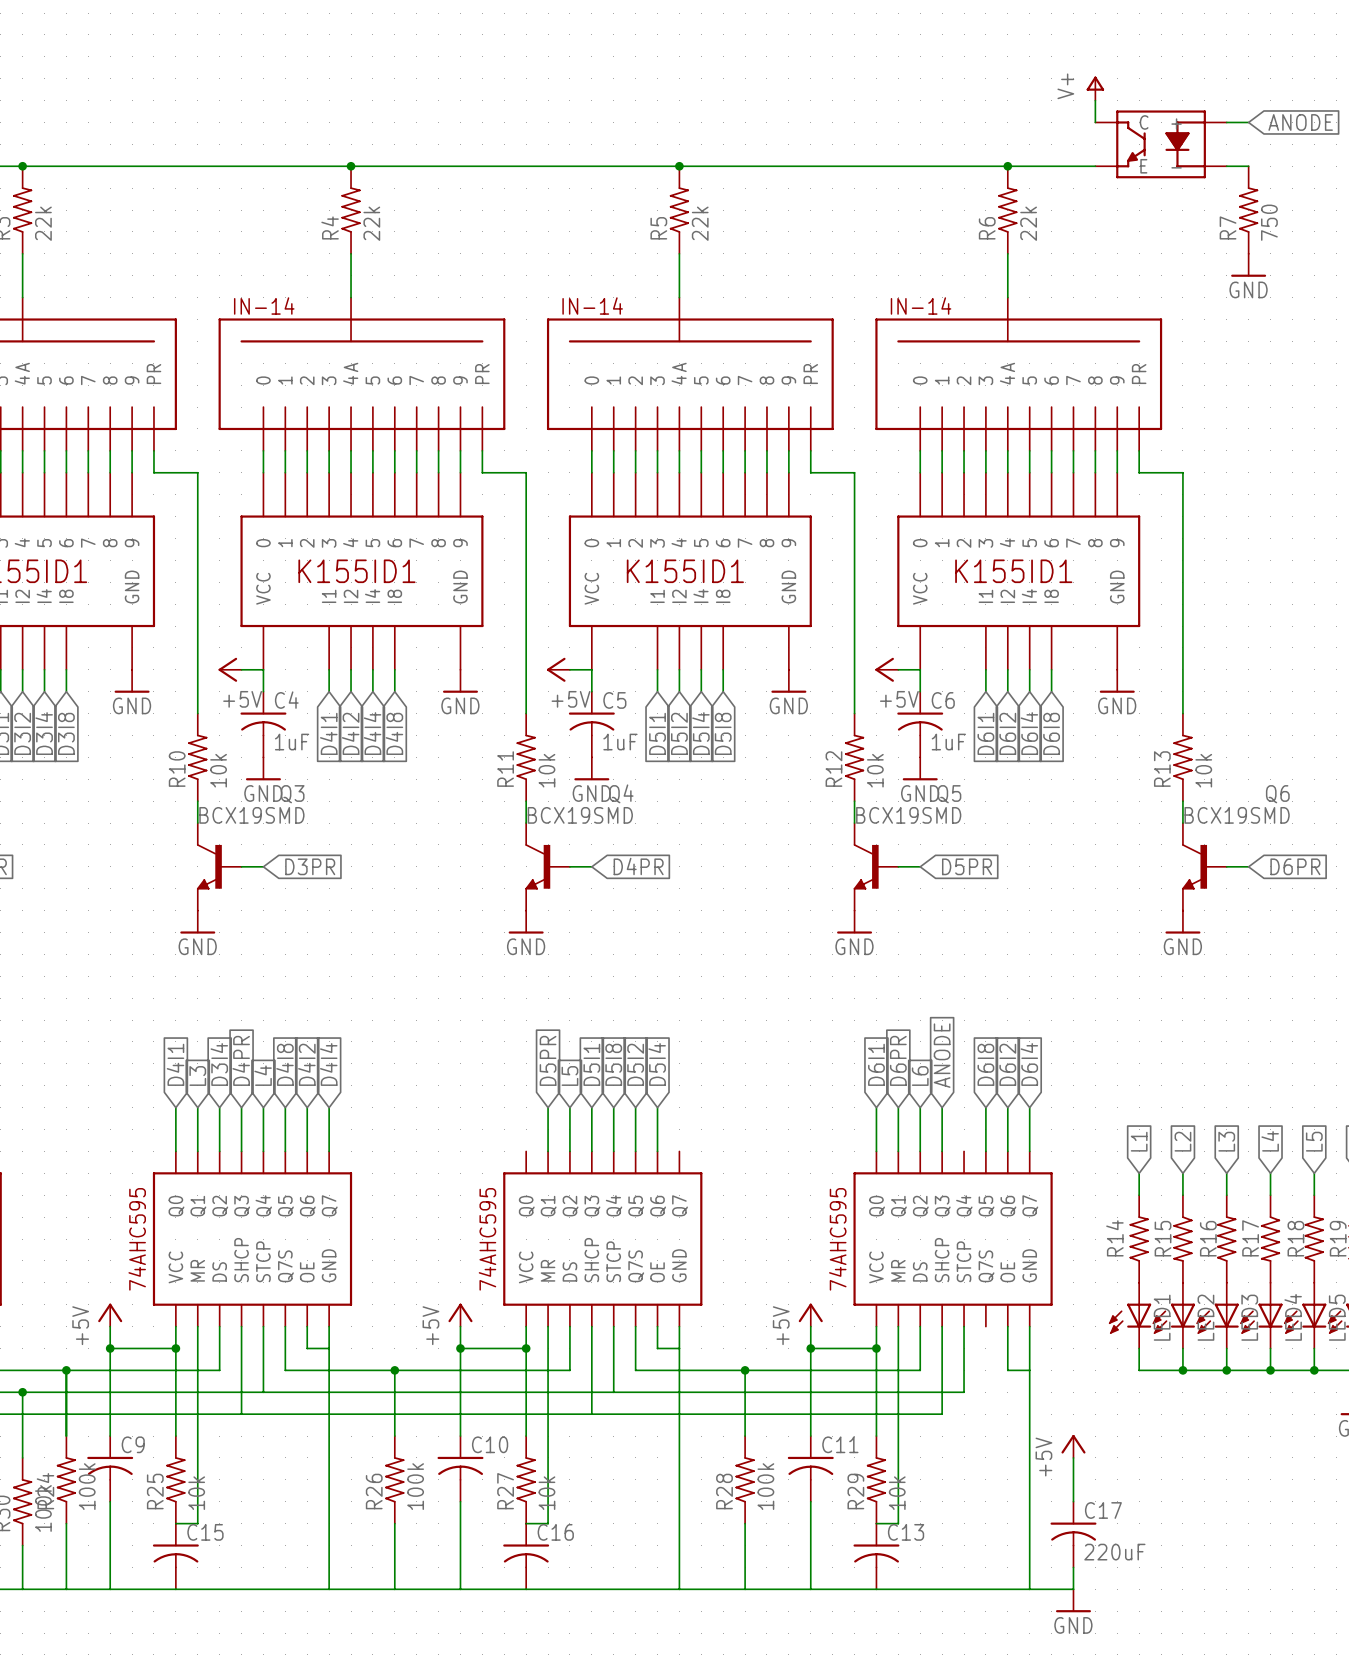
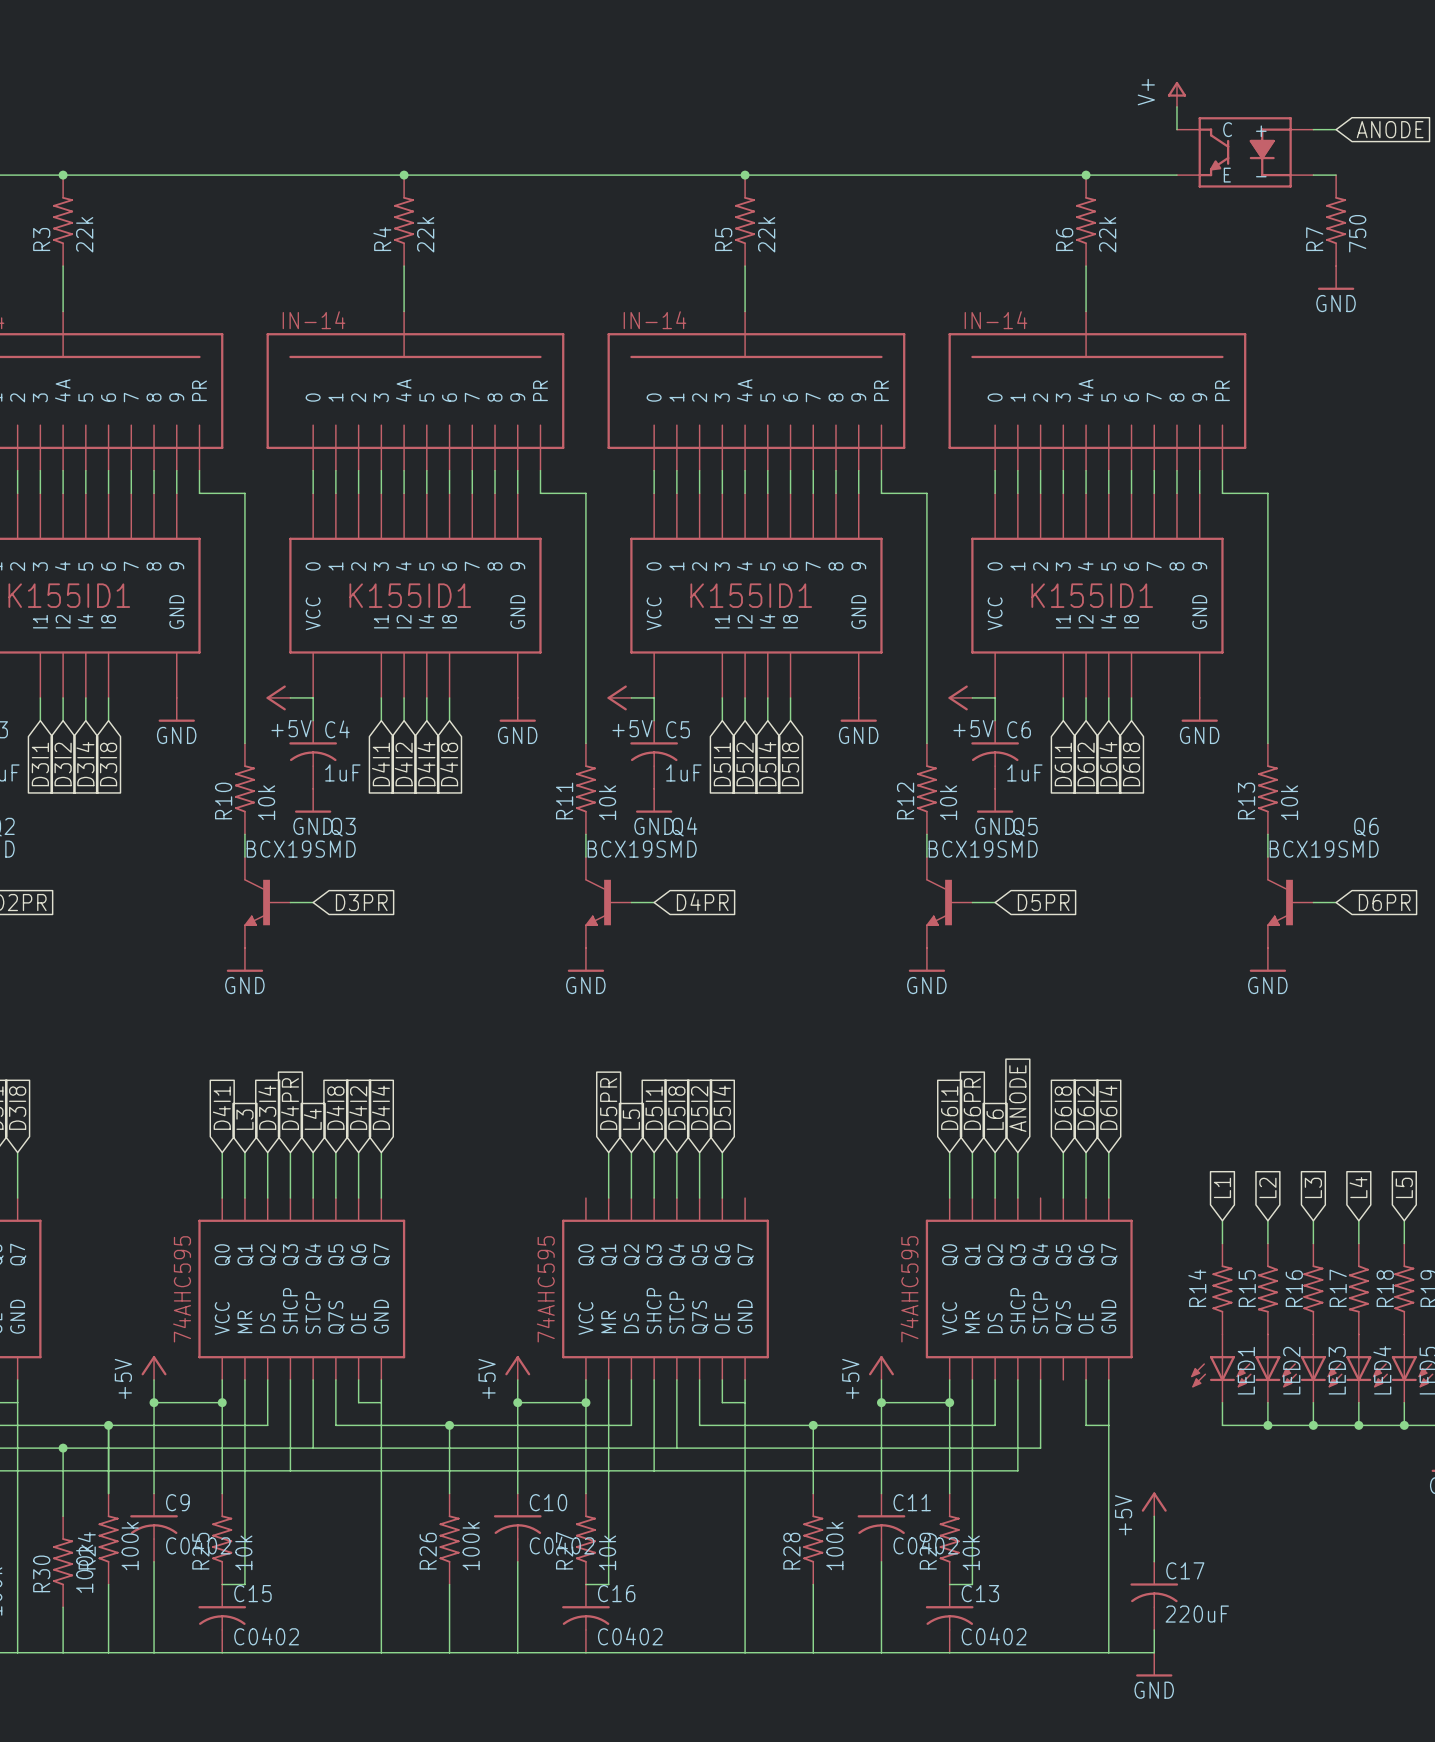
C9 value: none -> C0402 (198, 1545)
C10 value: none -> C0402 (562, 1545)
C11 value: none -> C0402 (925, 1545)
C15 value: none -> C0402 (266, 1636)
C16 value: none -> C0402 (630, 1636)
C13 value: none -> C0402 (994, 1636)

